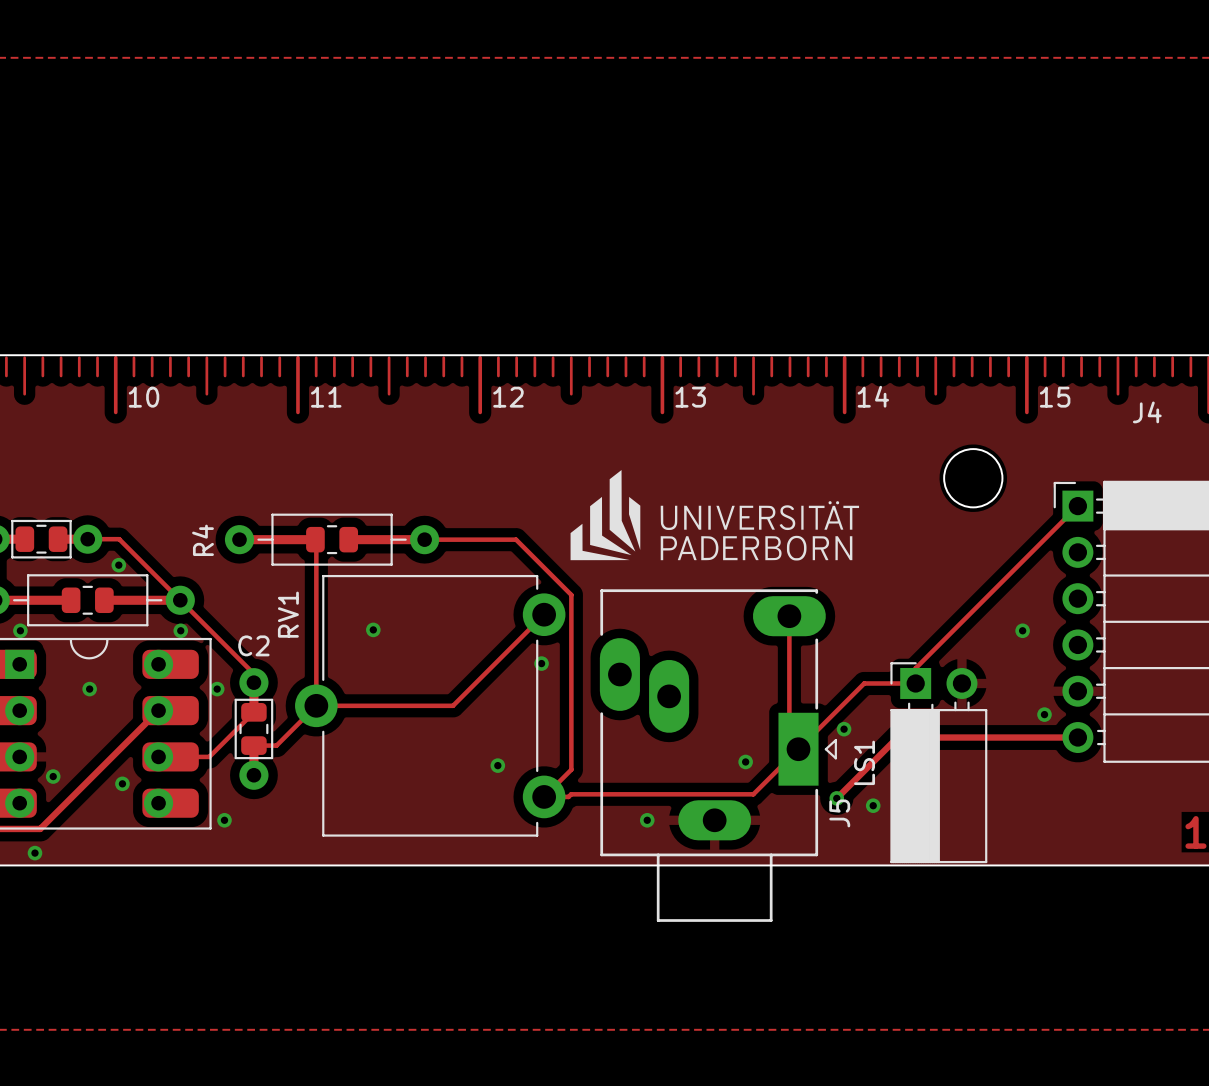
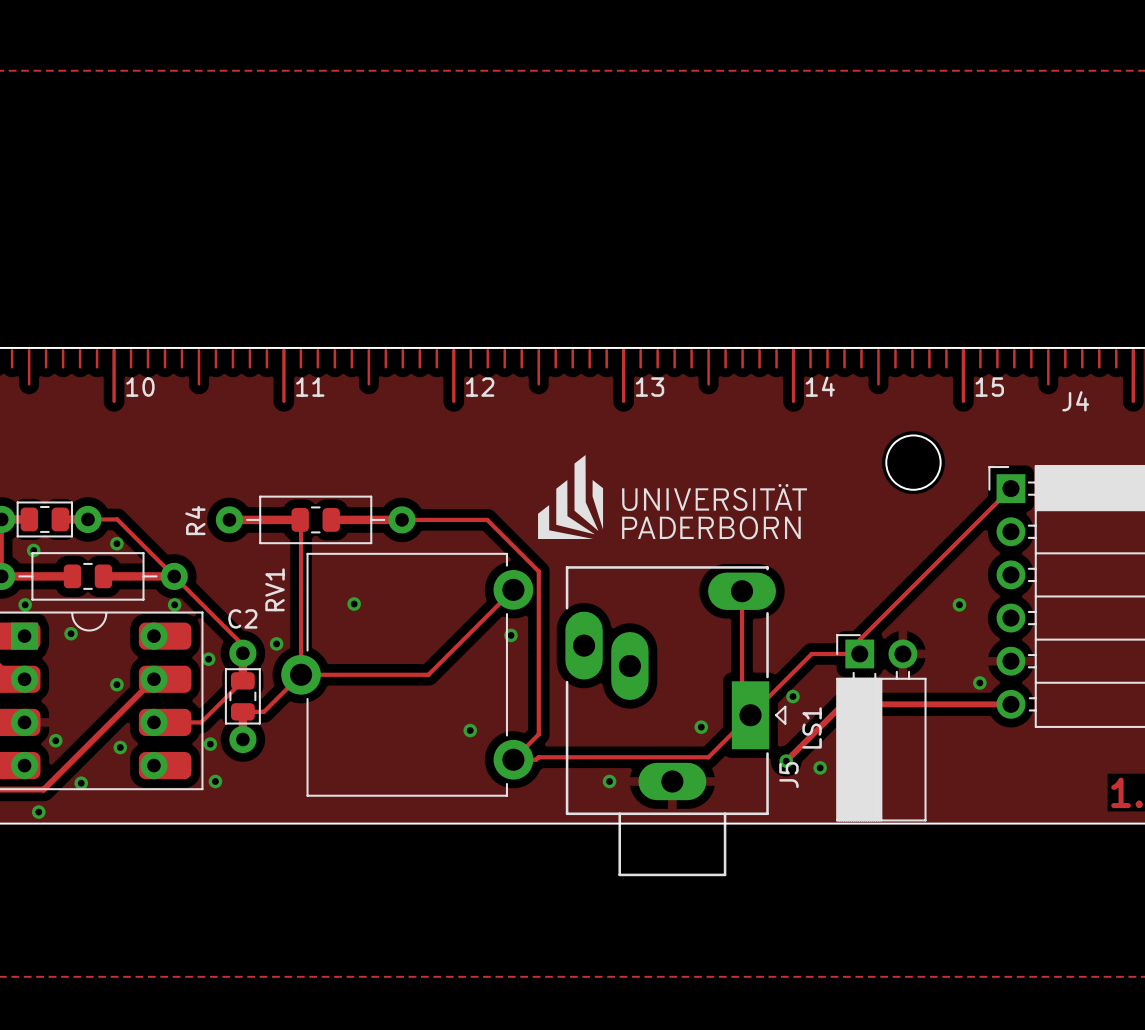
via: none -> (33, 550)
via: none -> (71, 633)
via: none -> (276, 643)
via: (89, 689) -> none
via: none -> (116, 684)
via: none -> (210, 744)
via: none -> (81, 783)

